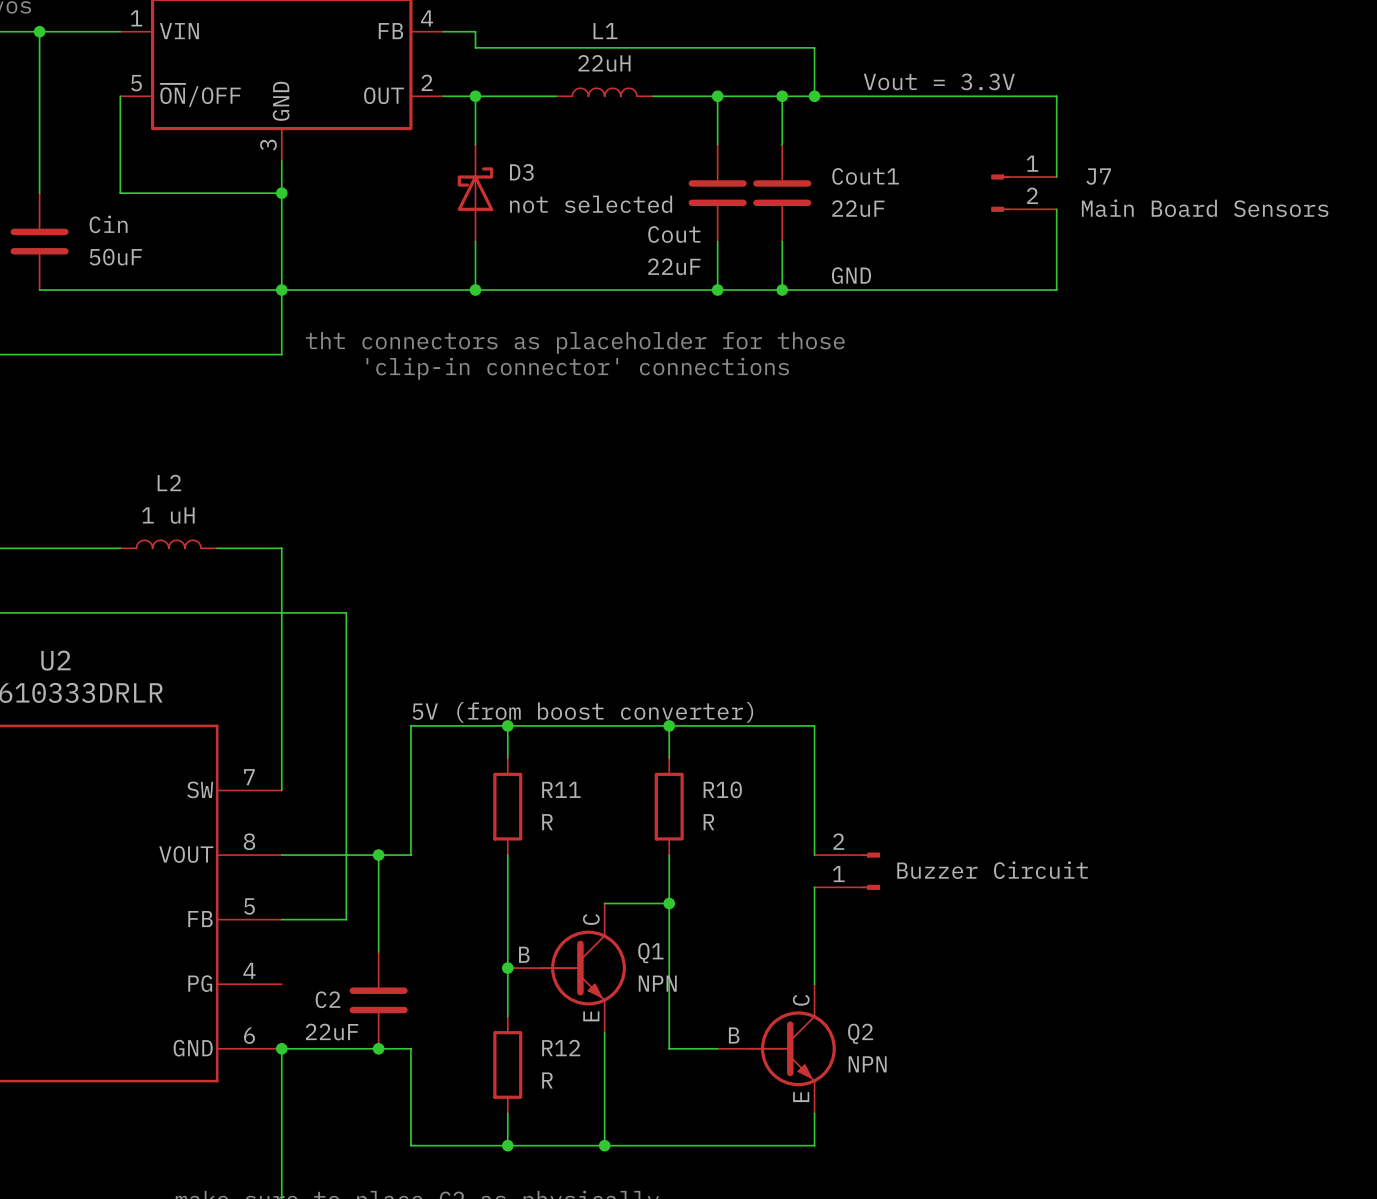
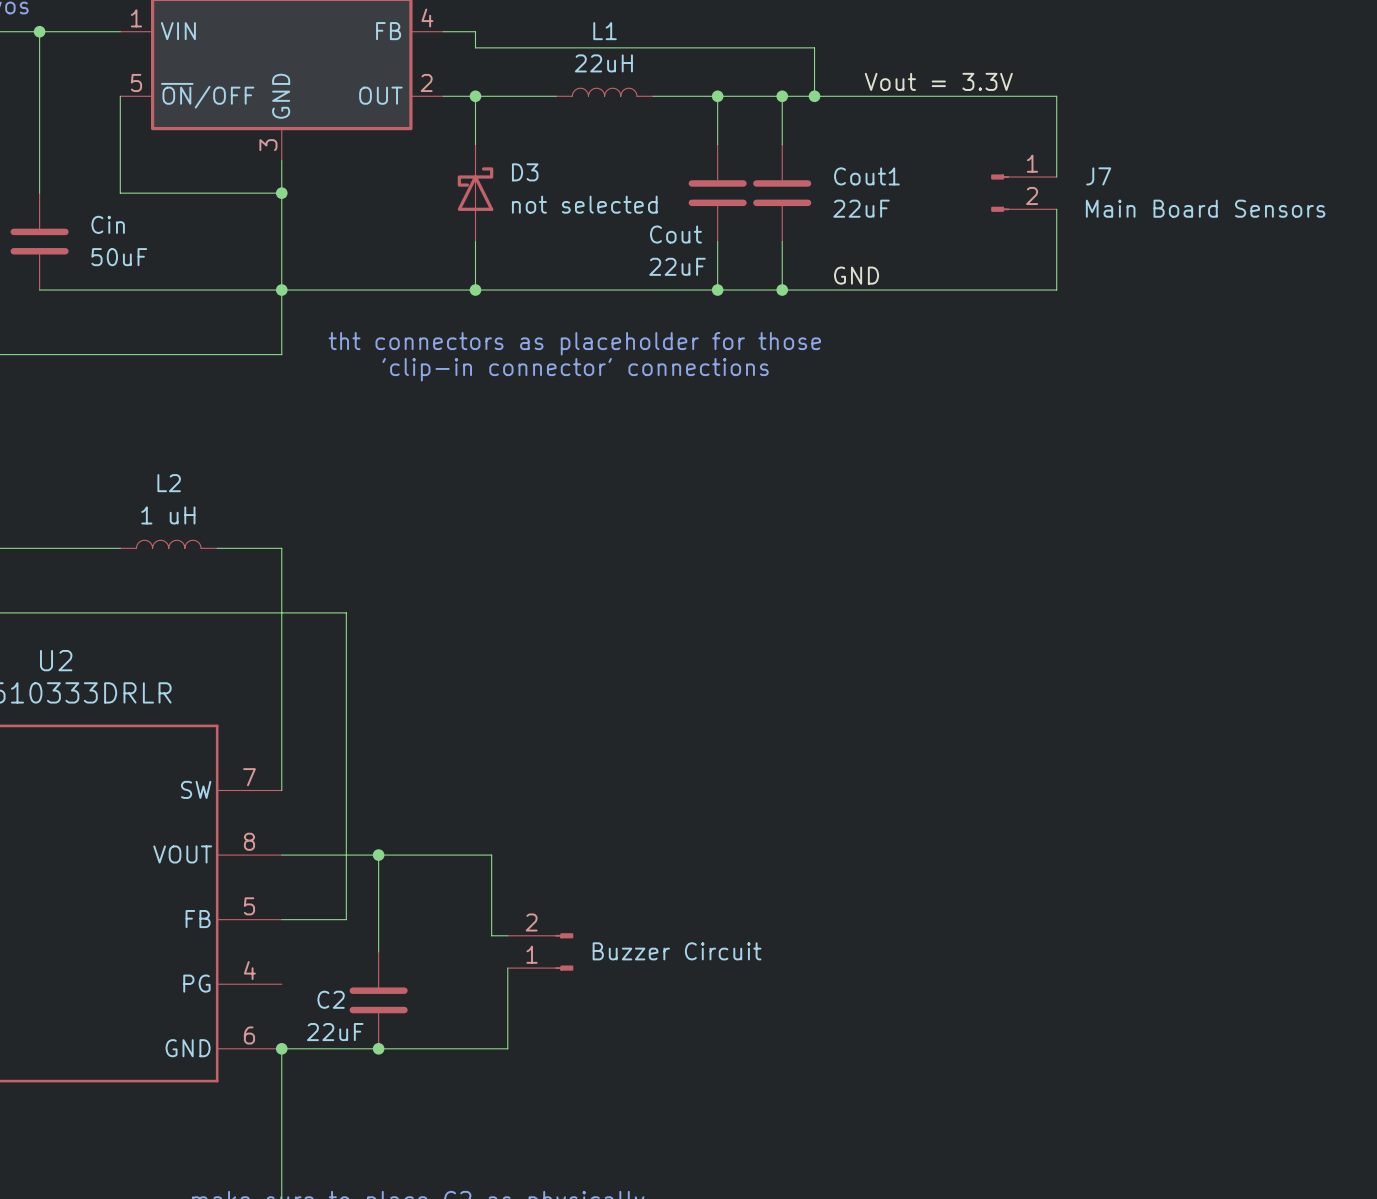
label: 5V (from boost converter) (582, 712) -> none
wire: (507, 725) (507, 758) -> none
junction: (507, 725) -> none
wire: (669, 725) (669, 758) -> none
junction: (669, 725) -> none
R11: R (507, 806) -> none
R10: R (669, 806) -> none
wire: (410, 855) (410, 725) (814, 725) (814, 855) -> (410, 855) (491, 855) (491, 935) (507, 935)
wire: (507, 855) (507, 968) -> none
wire: (669, 855) (669, 1048) (717, 1048) -> none
part position: (847, 871) -> (540, 951)
wire: (814, 887) (814, 984) -> none
wire: (604, 903) (669, 903) -> none
junction: (669, 903) -> none
junction: (507, 968) -> none
Q1: NPN (566, 968) -> none
wire: (604, 1032) (604, 1145) -> none
wire: (410, 1048) (410, 1145) (814, 1145) (814, 1113) -> (410, 1048) (507, 1048) (507, 1016)
Q2: NPN (776, 1048) -> none
R12: R (507, 1064) -> none
wire: (507, 1113) (507, 1145) -> none
junction: (507, 1145) -> none
junction: (604, 1145) -> none

